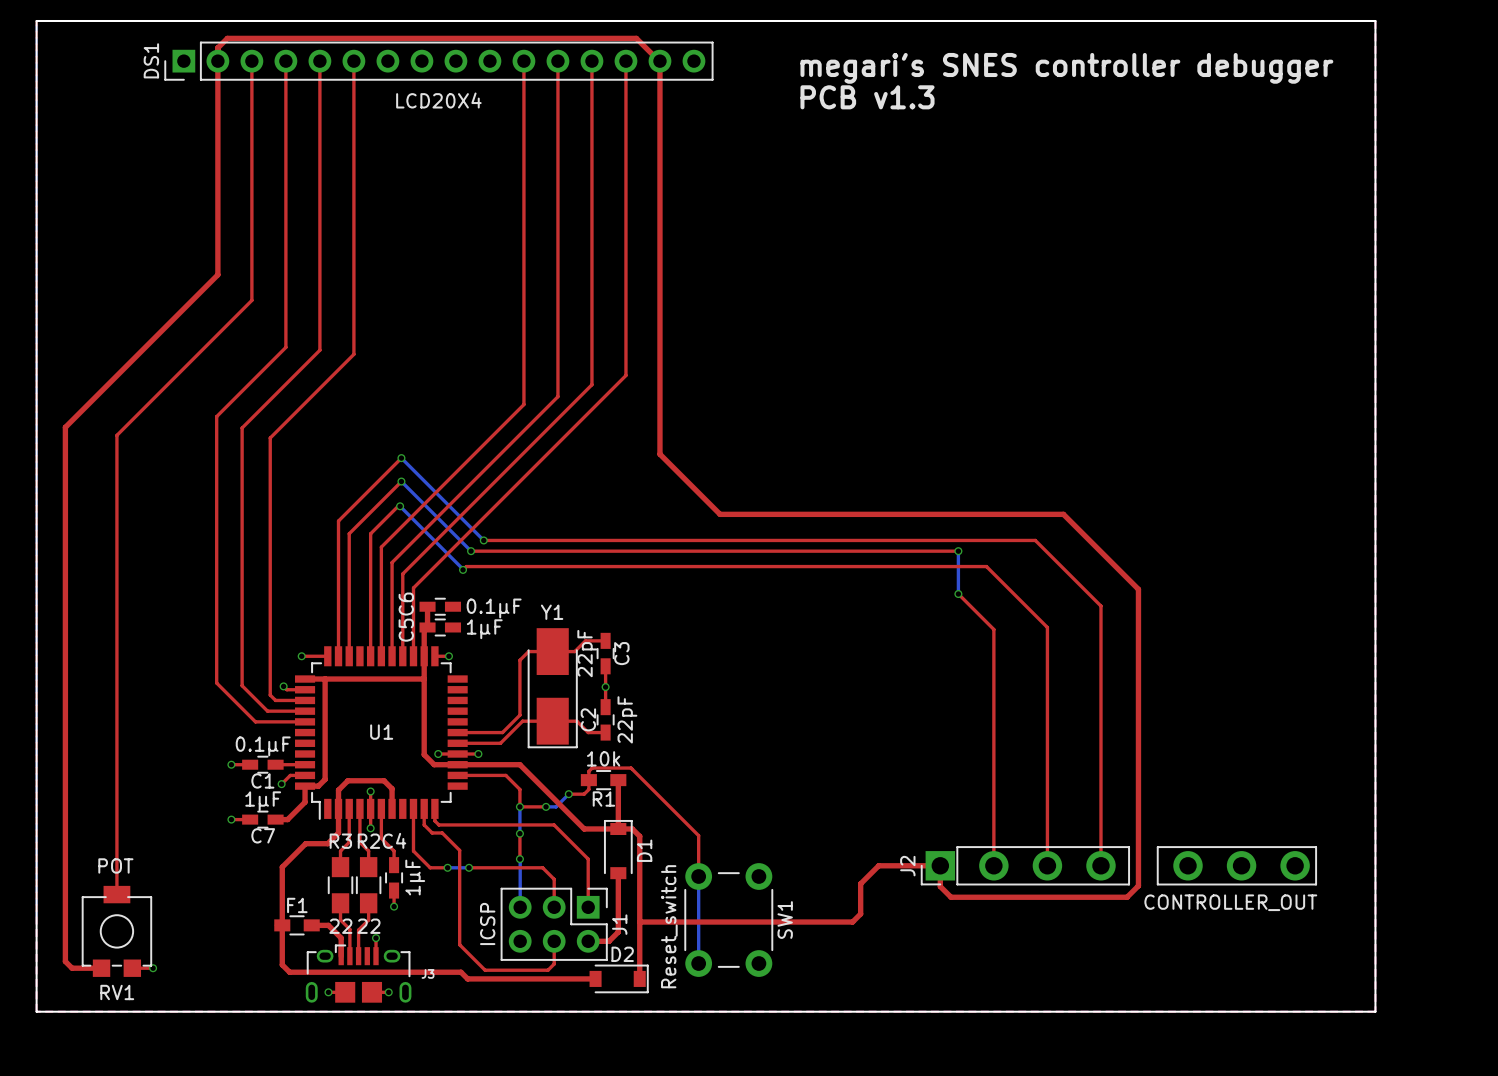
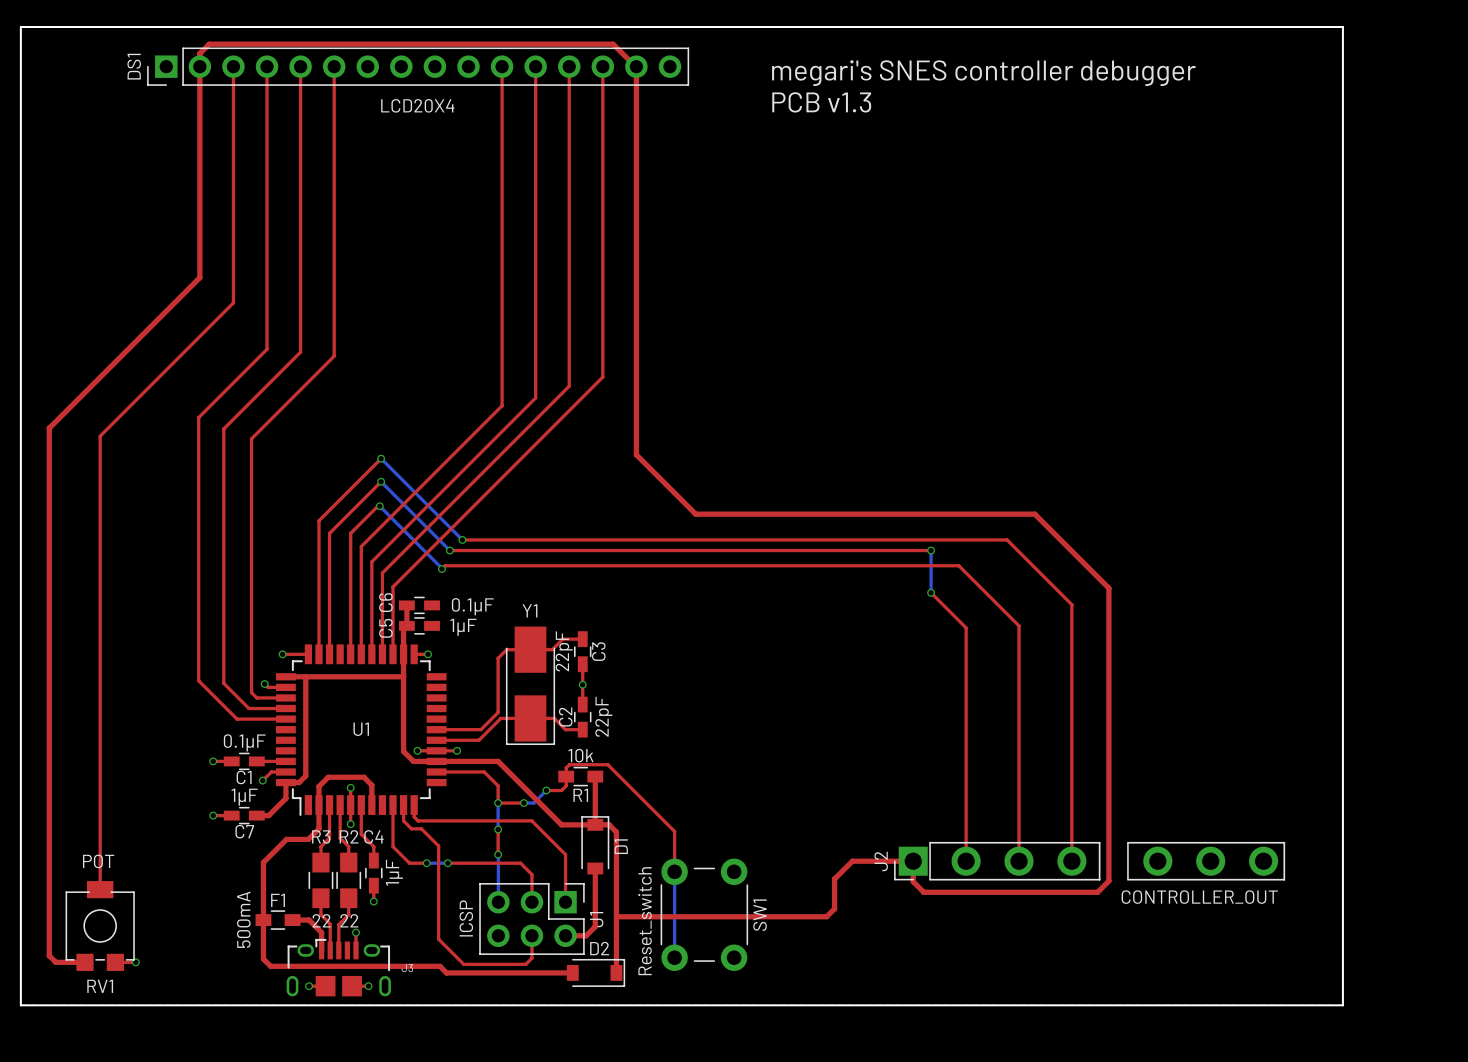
F1 value: none -> 500mA (243, 919)

